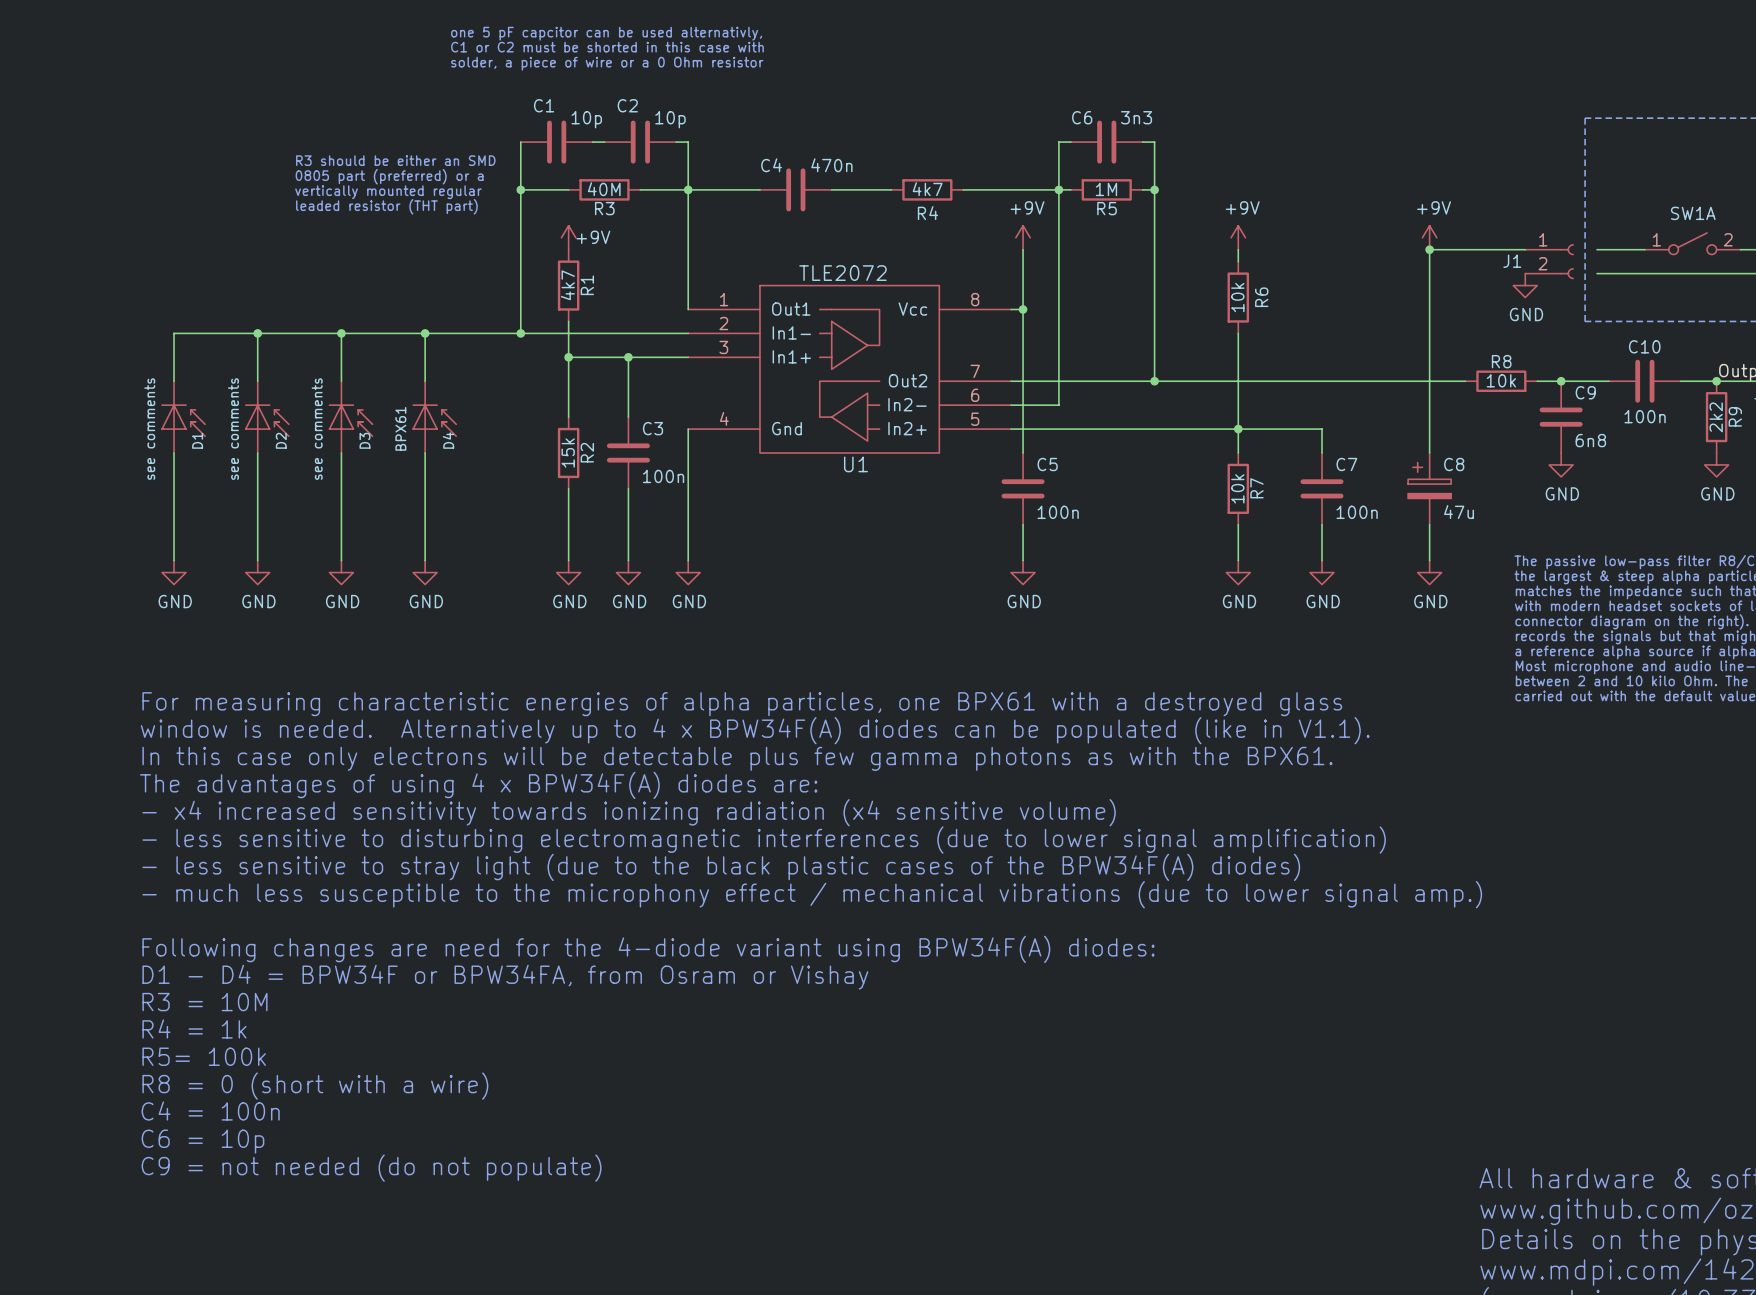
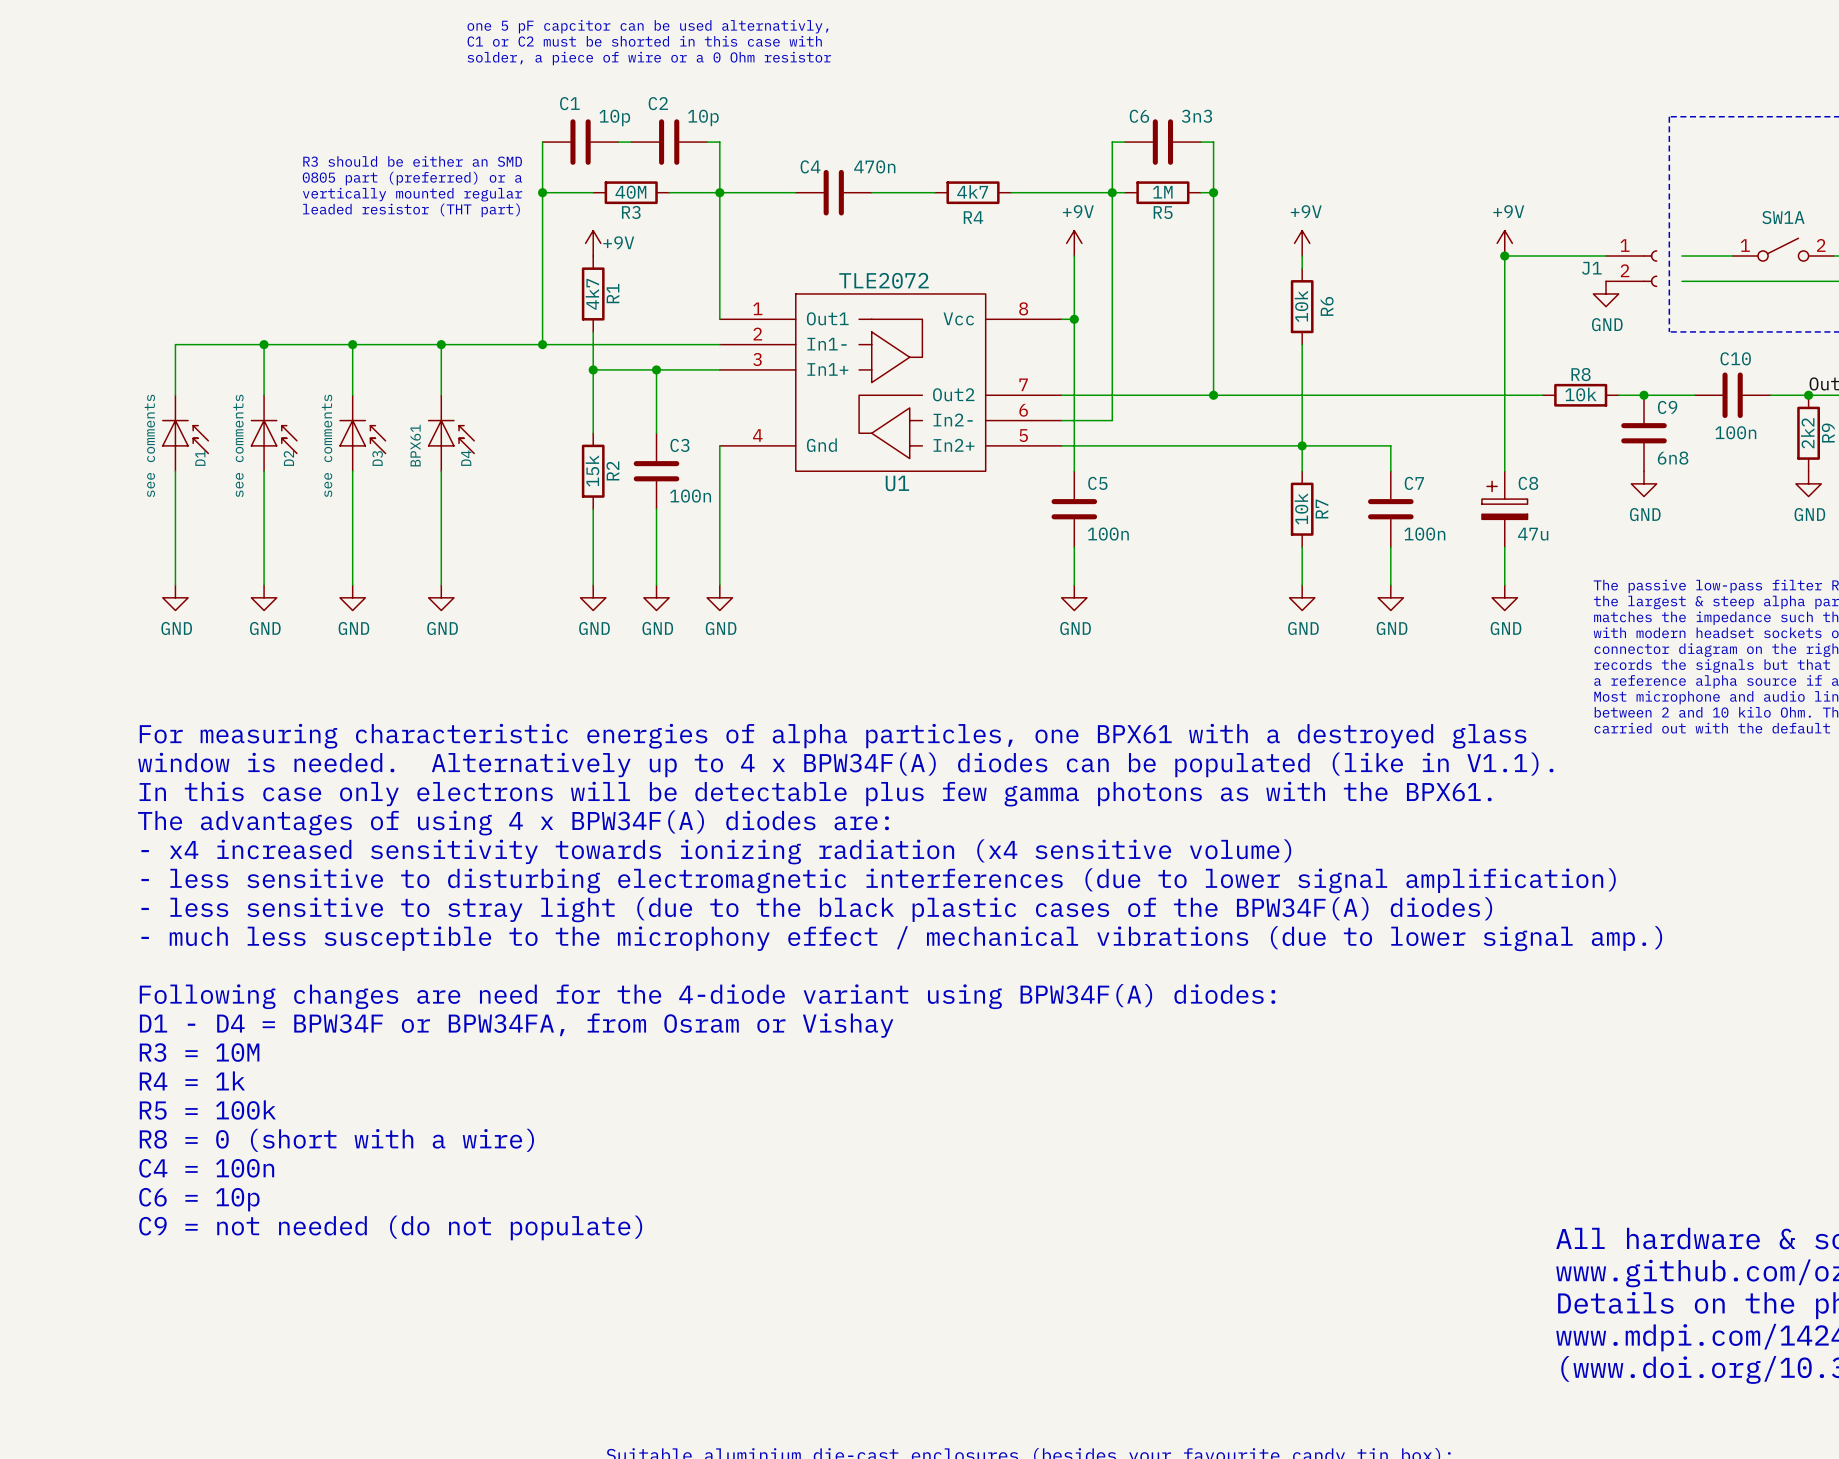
text: R5= 100k (204, 1056) -> R5 = 100k (207, 1110)

